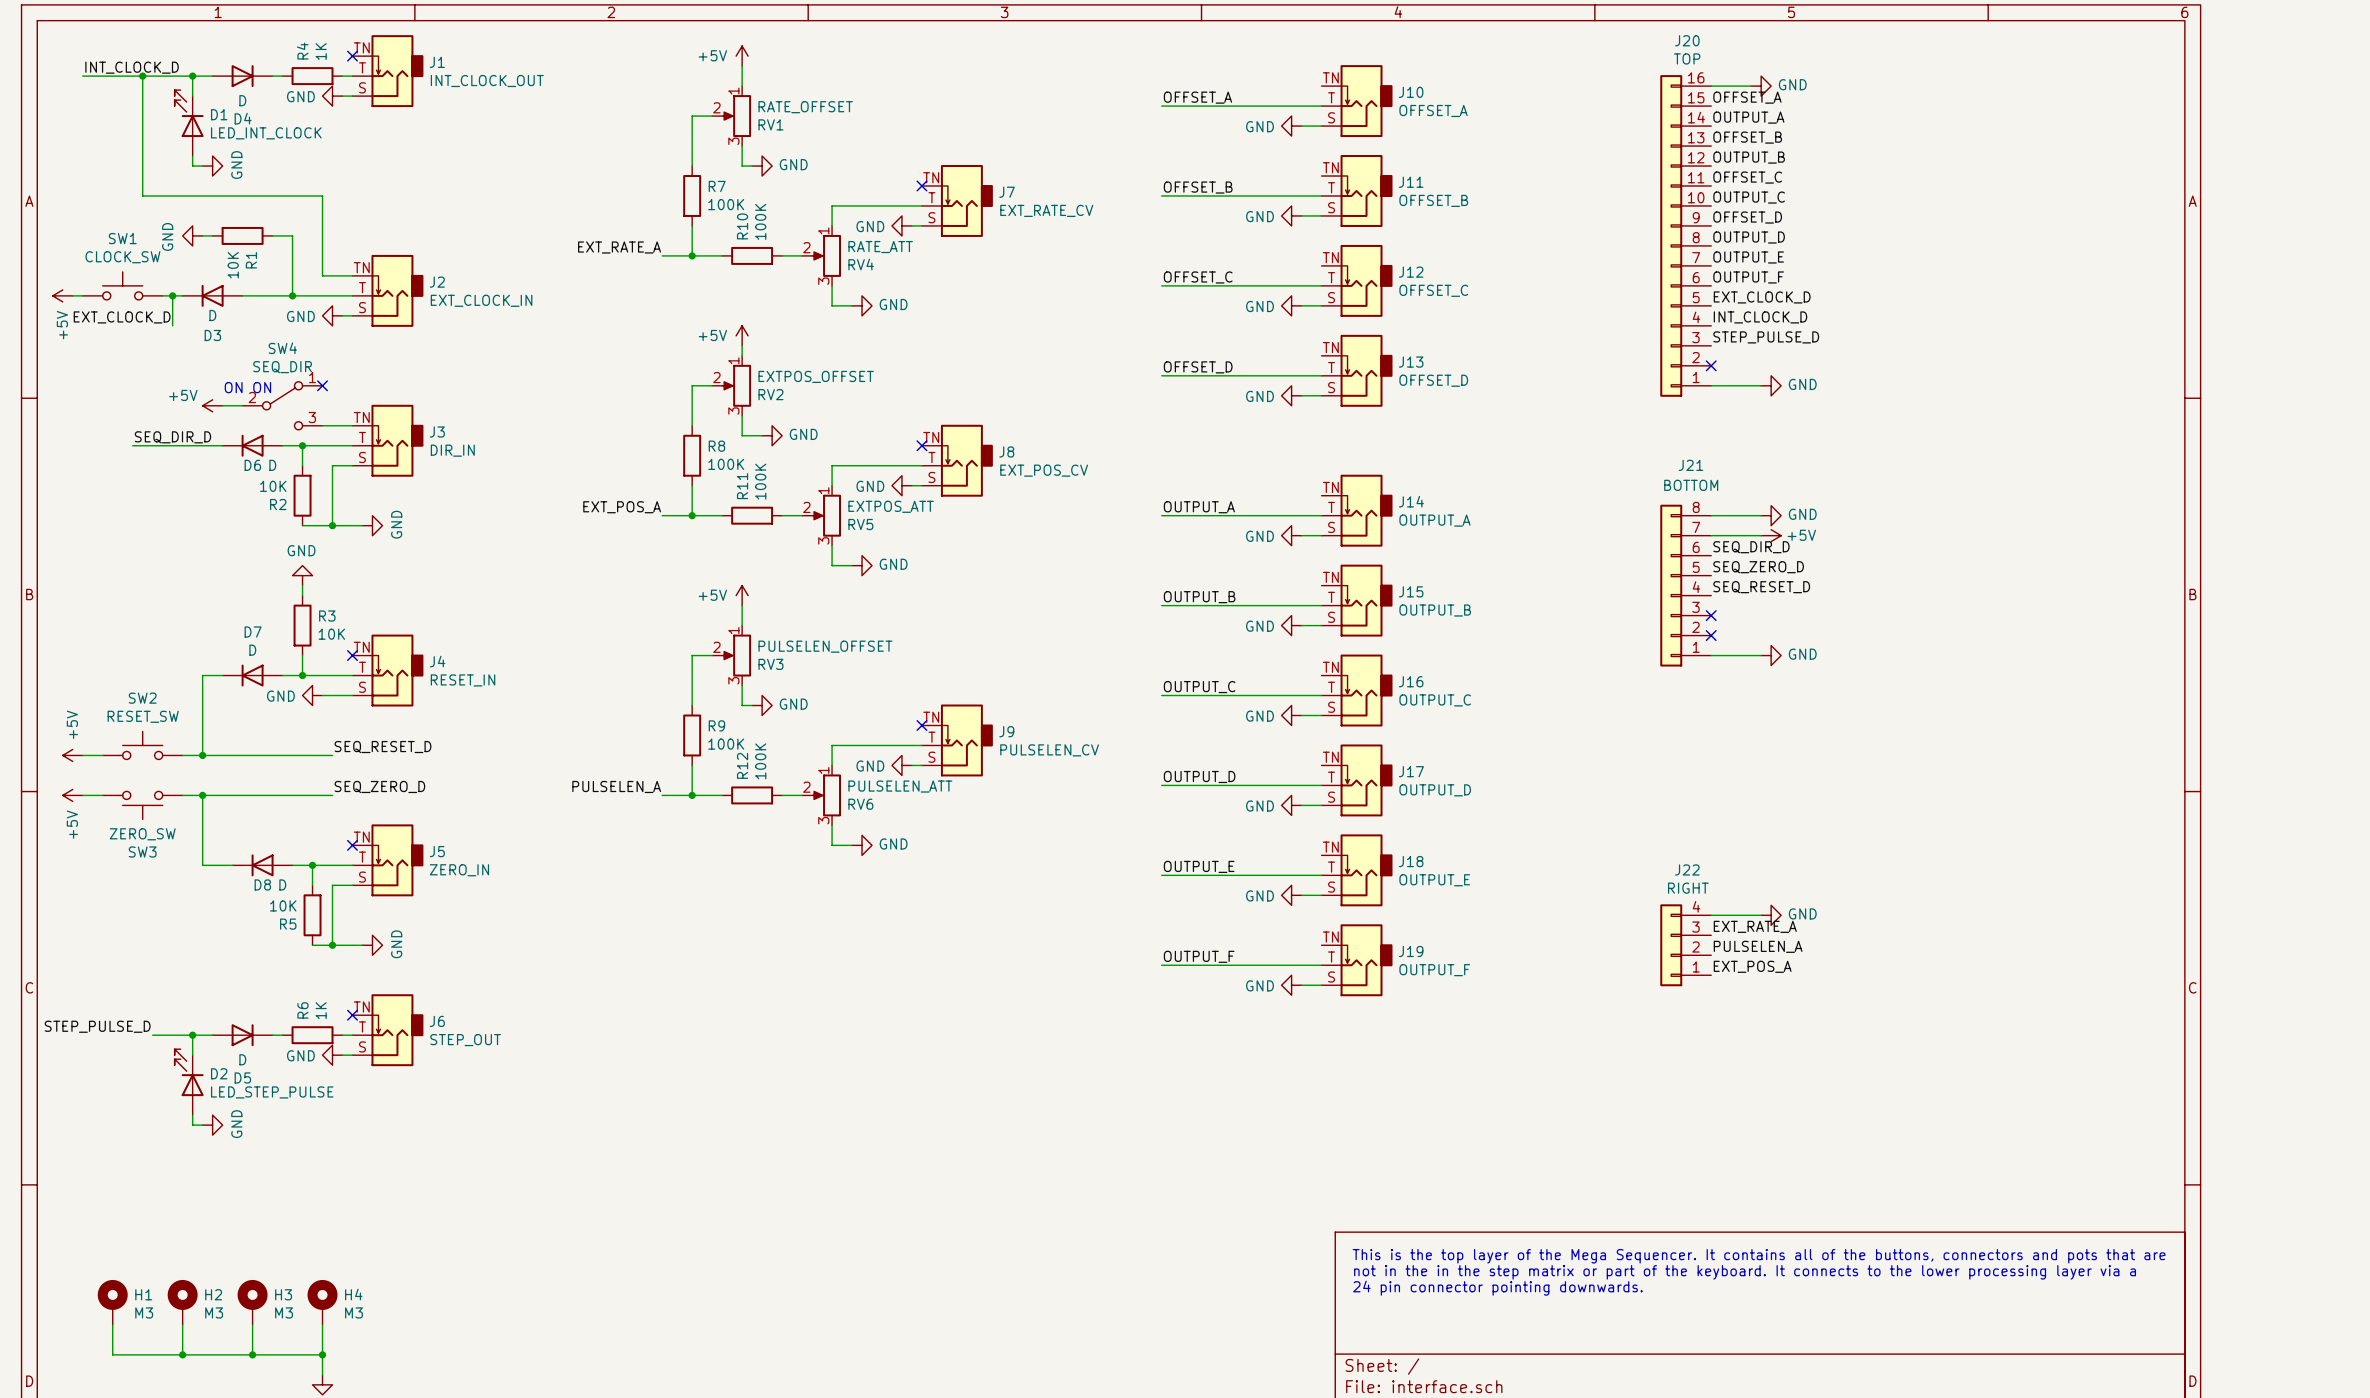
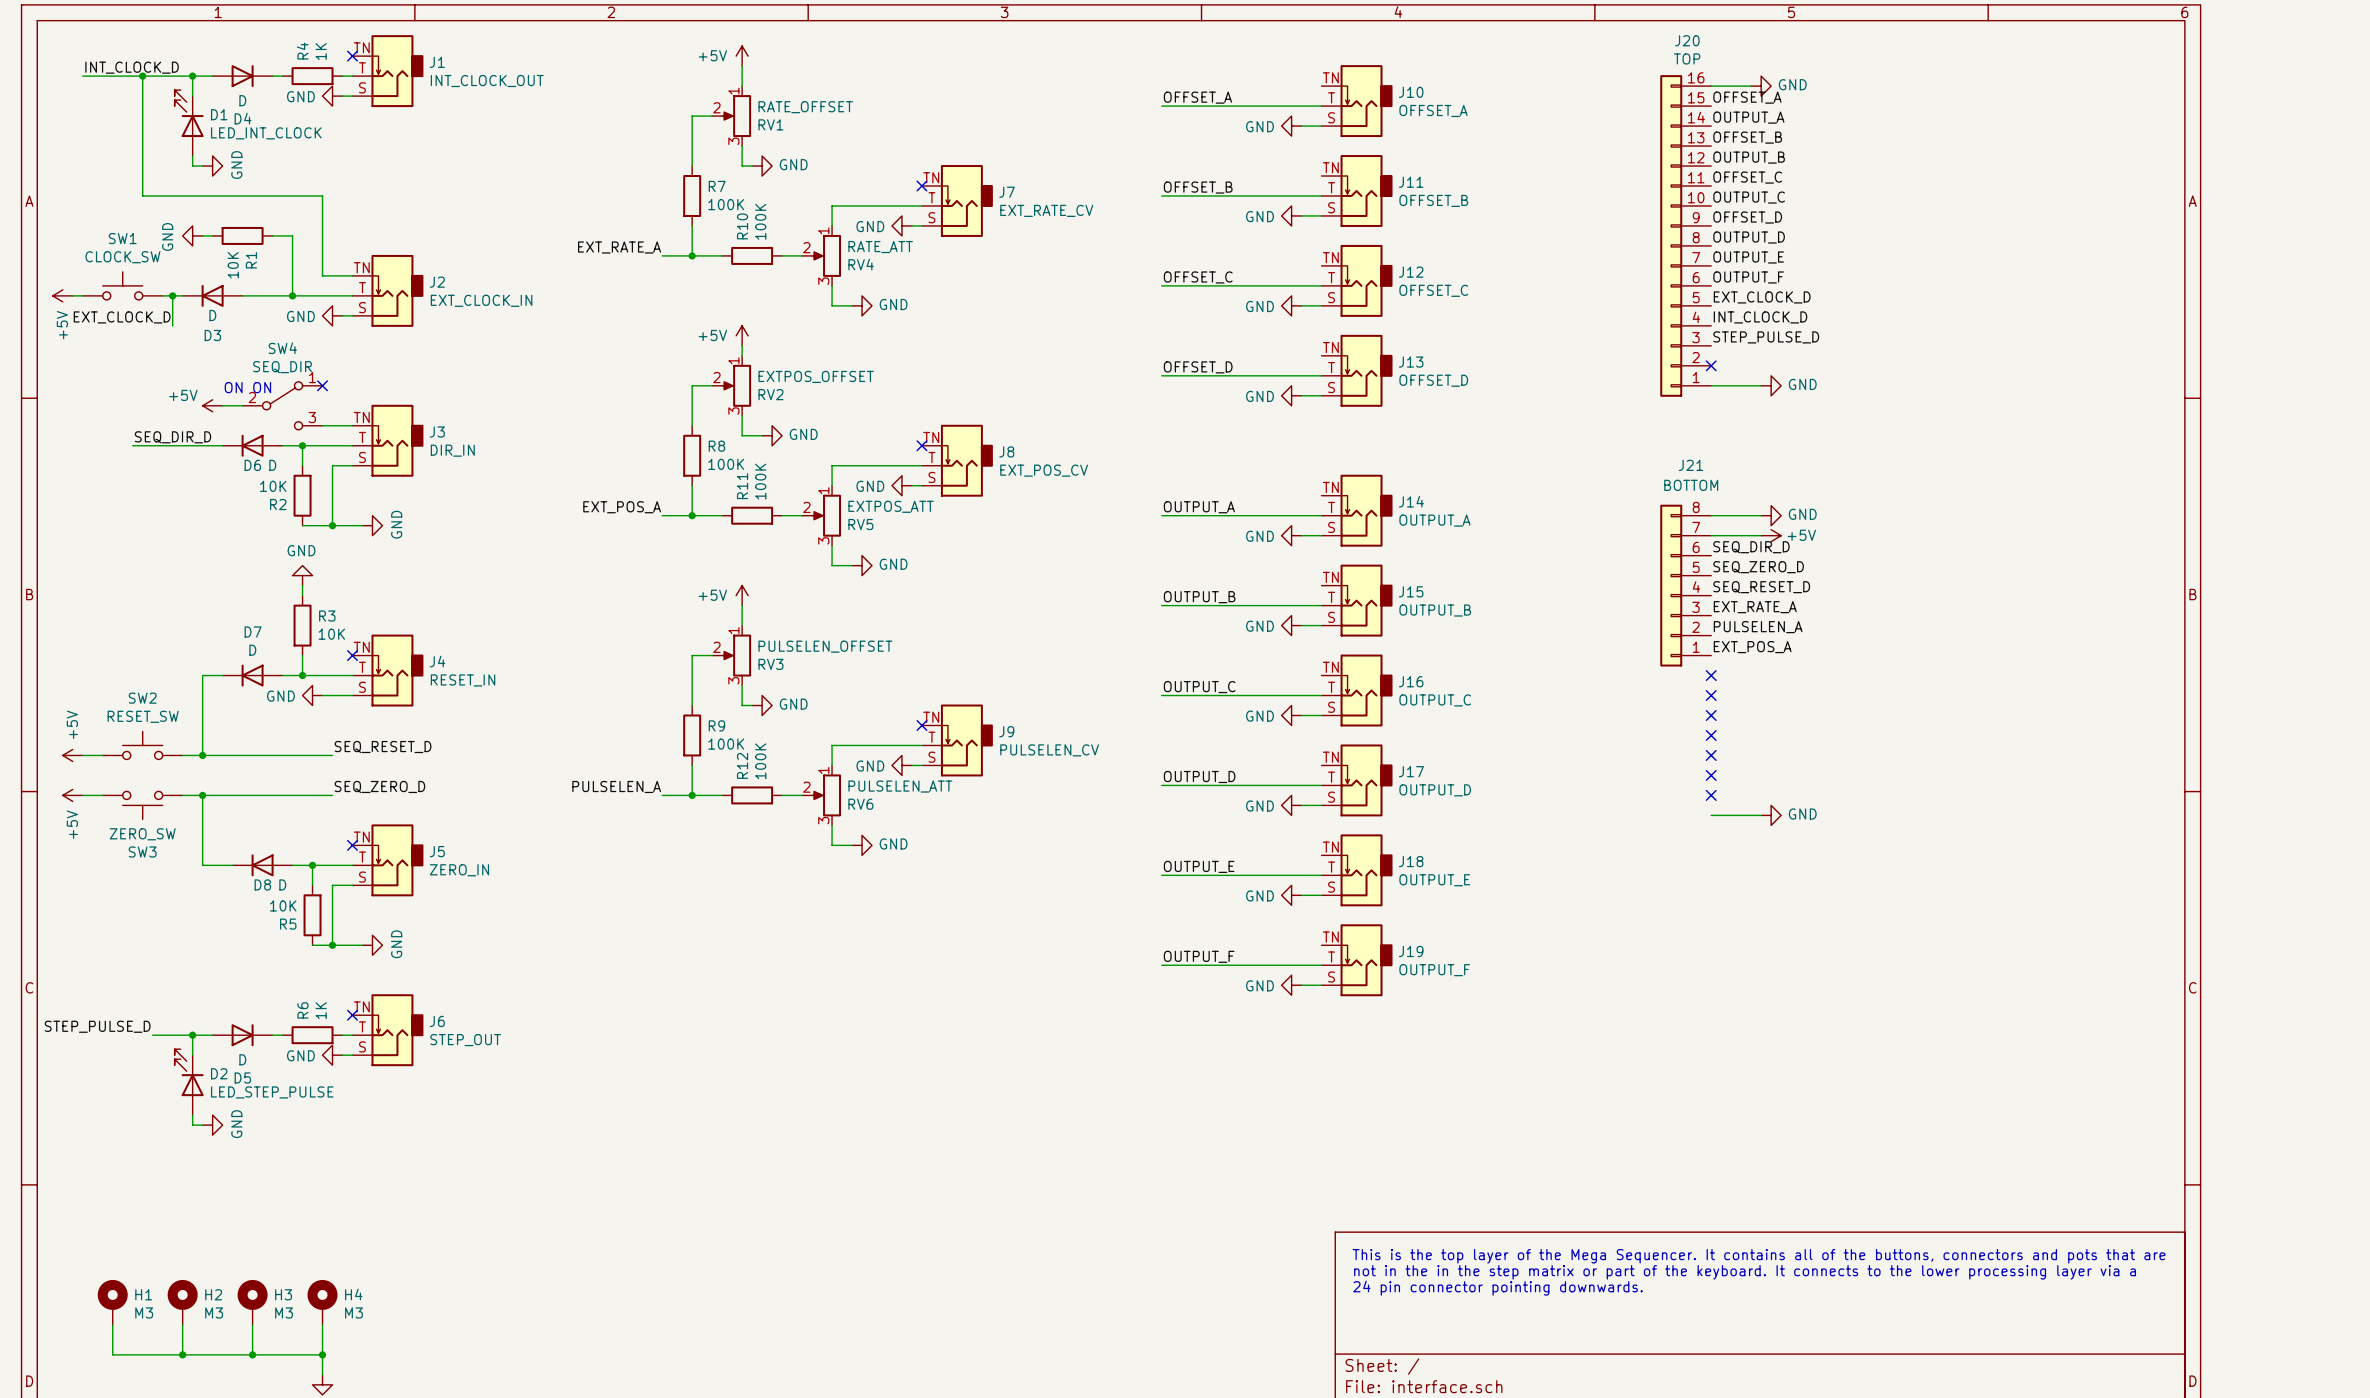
label: none -> EXT_RATE_A (1755, 607)
no-connect mark: (1711, 615) -> none
label: none -> PULSELEN_A (1758, 627)
no-connect mark: (1711, 635) -> none
label: none -> EXT_POS_A (1752, 647)
wire: (1711, 655) (1761, 655) -> none
power symbol: GND (1771, 655) -> none
no-connect mark: none -> (1711, 675)
no-connect mark: none -> (1711, 695)
no-connect mark: none -> (1711, 715)
no-connect mark: none -> (1711, 735)
no-connect mark: none -> (1711, 755)
no-connect mark: none -> (1711, 775)
no-connect mark: none -> (1711, 795)
power symbol: none -> GND (1771, 815)
wire: (1711, 915) (1761, 915) -> (1711, 815) (1761, 815)
power symbol: GND (1771, 915) -> none
label: EXT_RATE_A (1755, 926) -> none
J22: RIGHT (1685, 945) -> none
label: PULSELEN_A (1758, 946) -> none
label: EXT_POS_A (1752, 966) -> none

